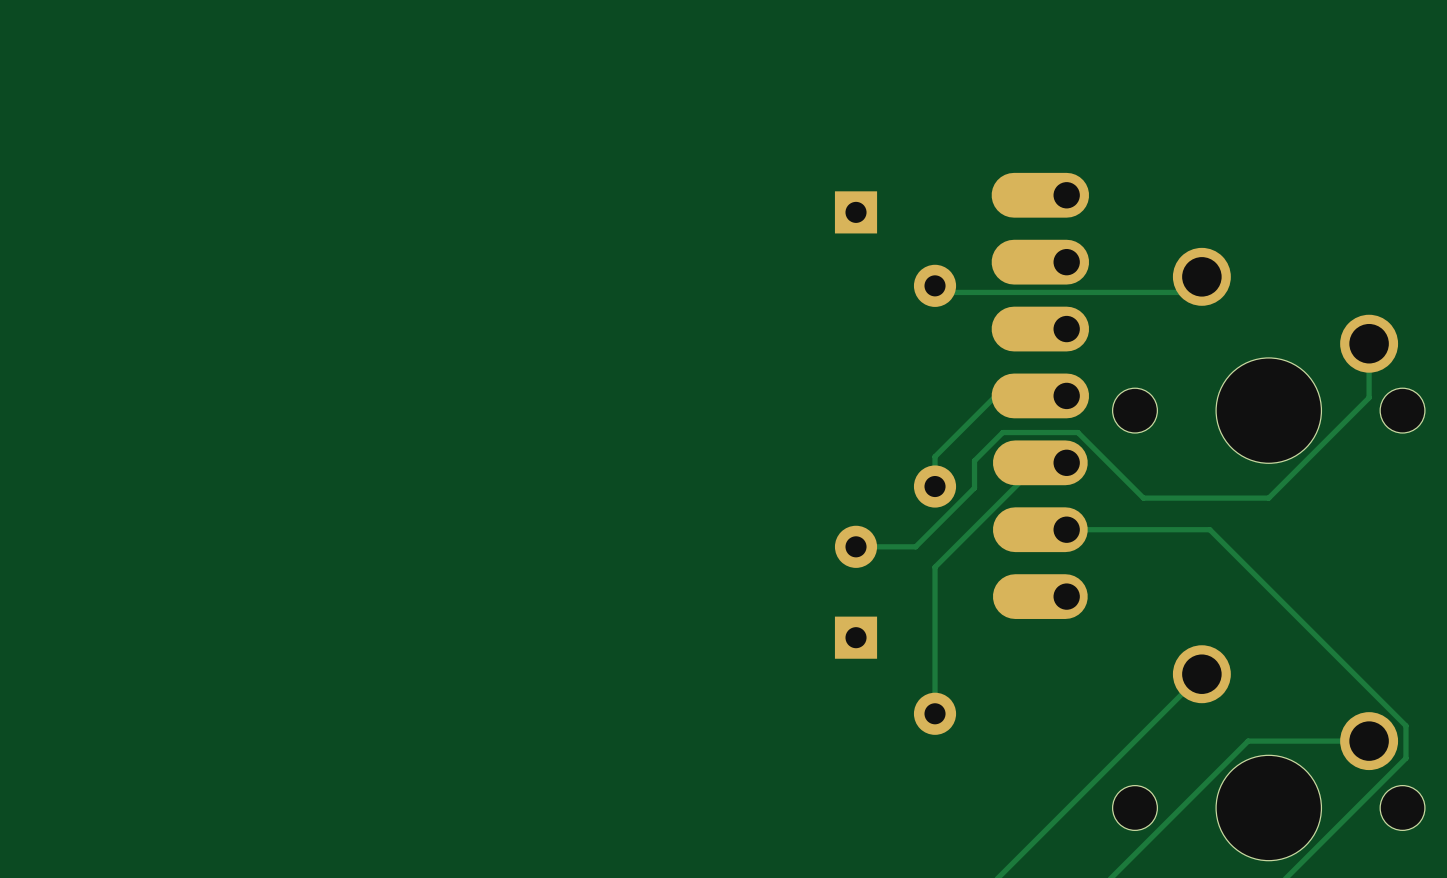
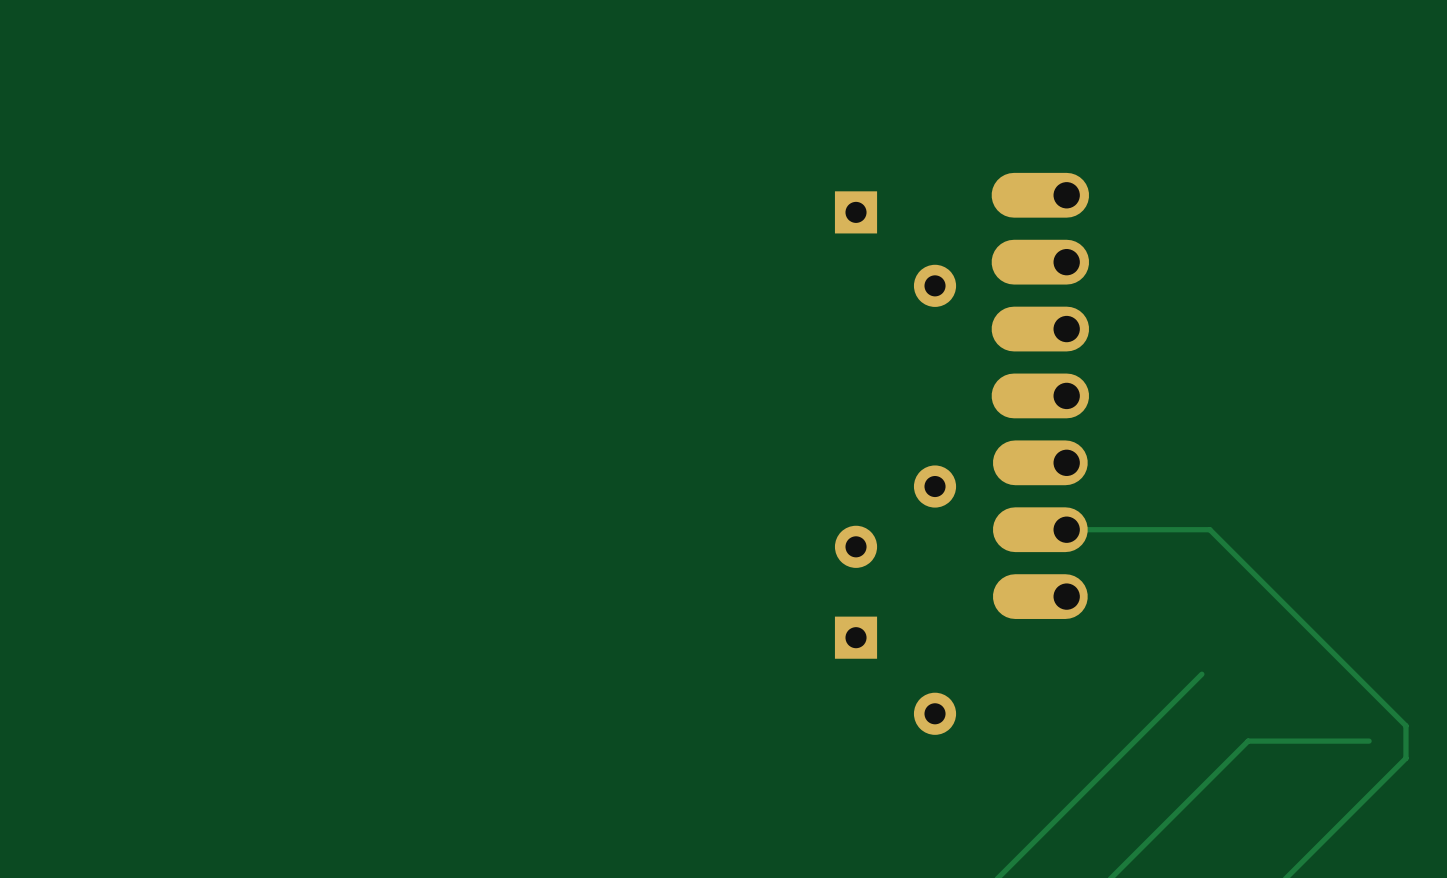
track: (1201, 276) (1186, 292) (941, 292) (935, 285) -> none
track: (1369, 343) (1369, 397) (1268, 498) (1143, 498) (1077, 432) (1002, 432) (974, 460) (974, 487) (915, 546) (856, 546) -> none
part: (1268, 355) -> none
track: (1066, 395) (995, 395) (935, 456) (935, 486) -> none
track: (1066, 462) (1039, 462) (935, 567) (935, 713) -> none
part: (1268, 752) -> none

